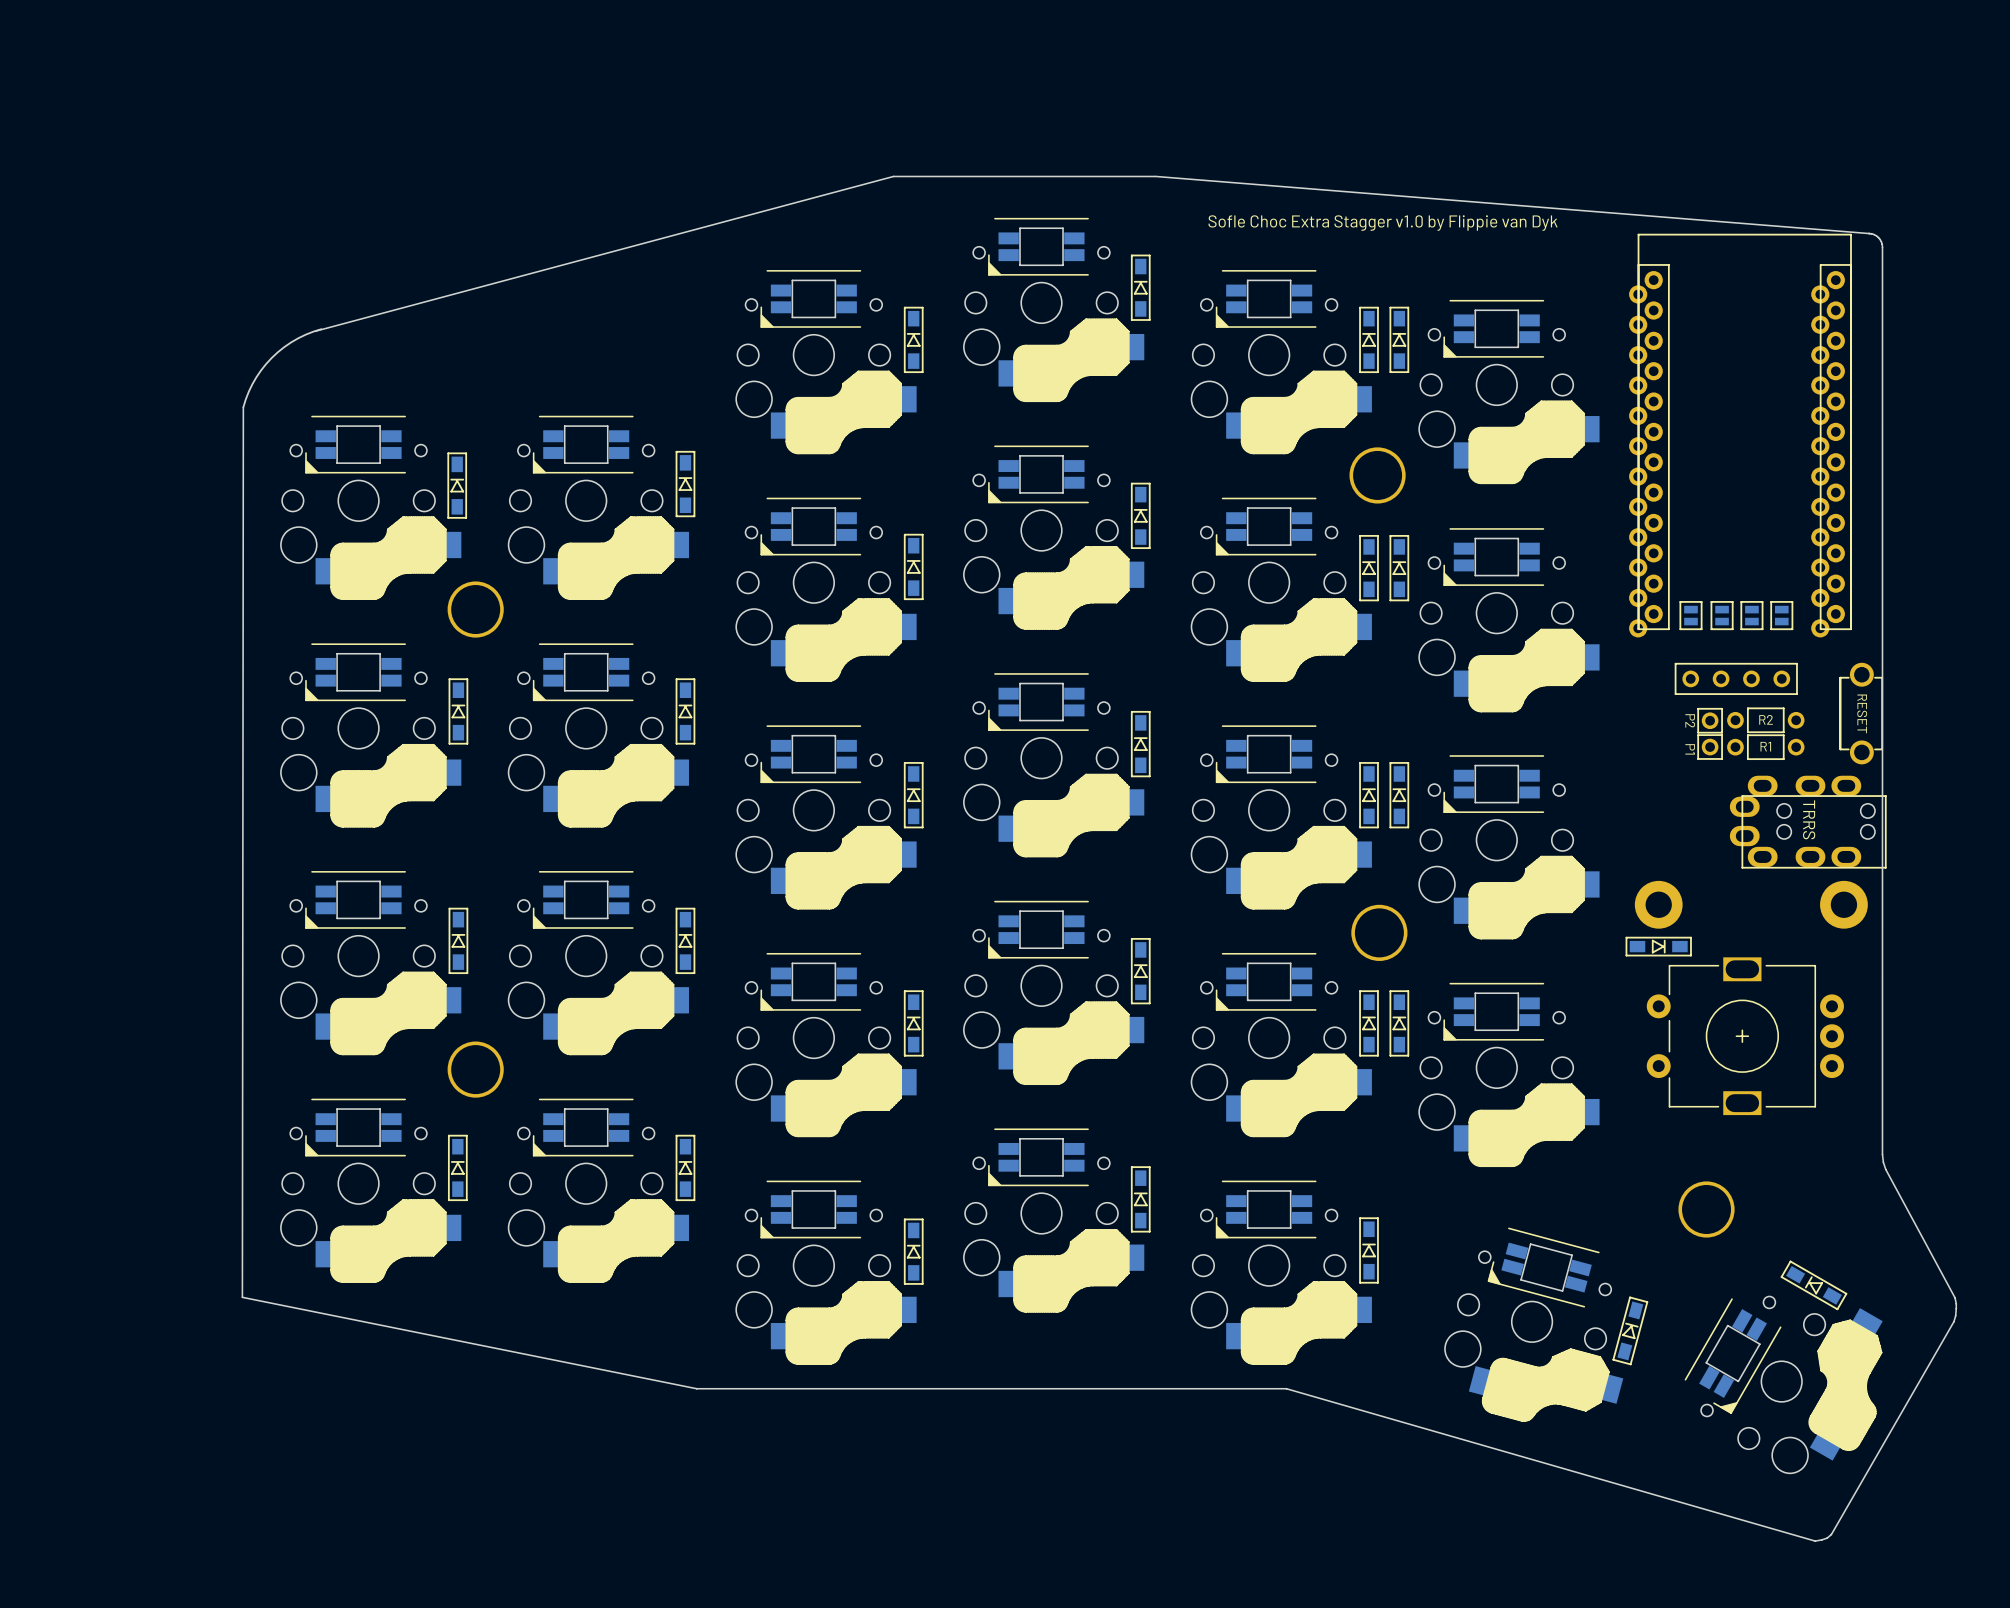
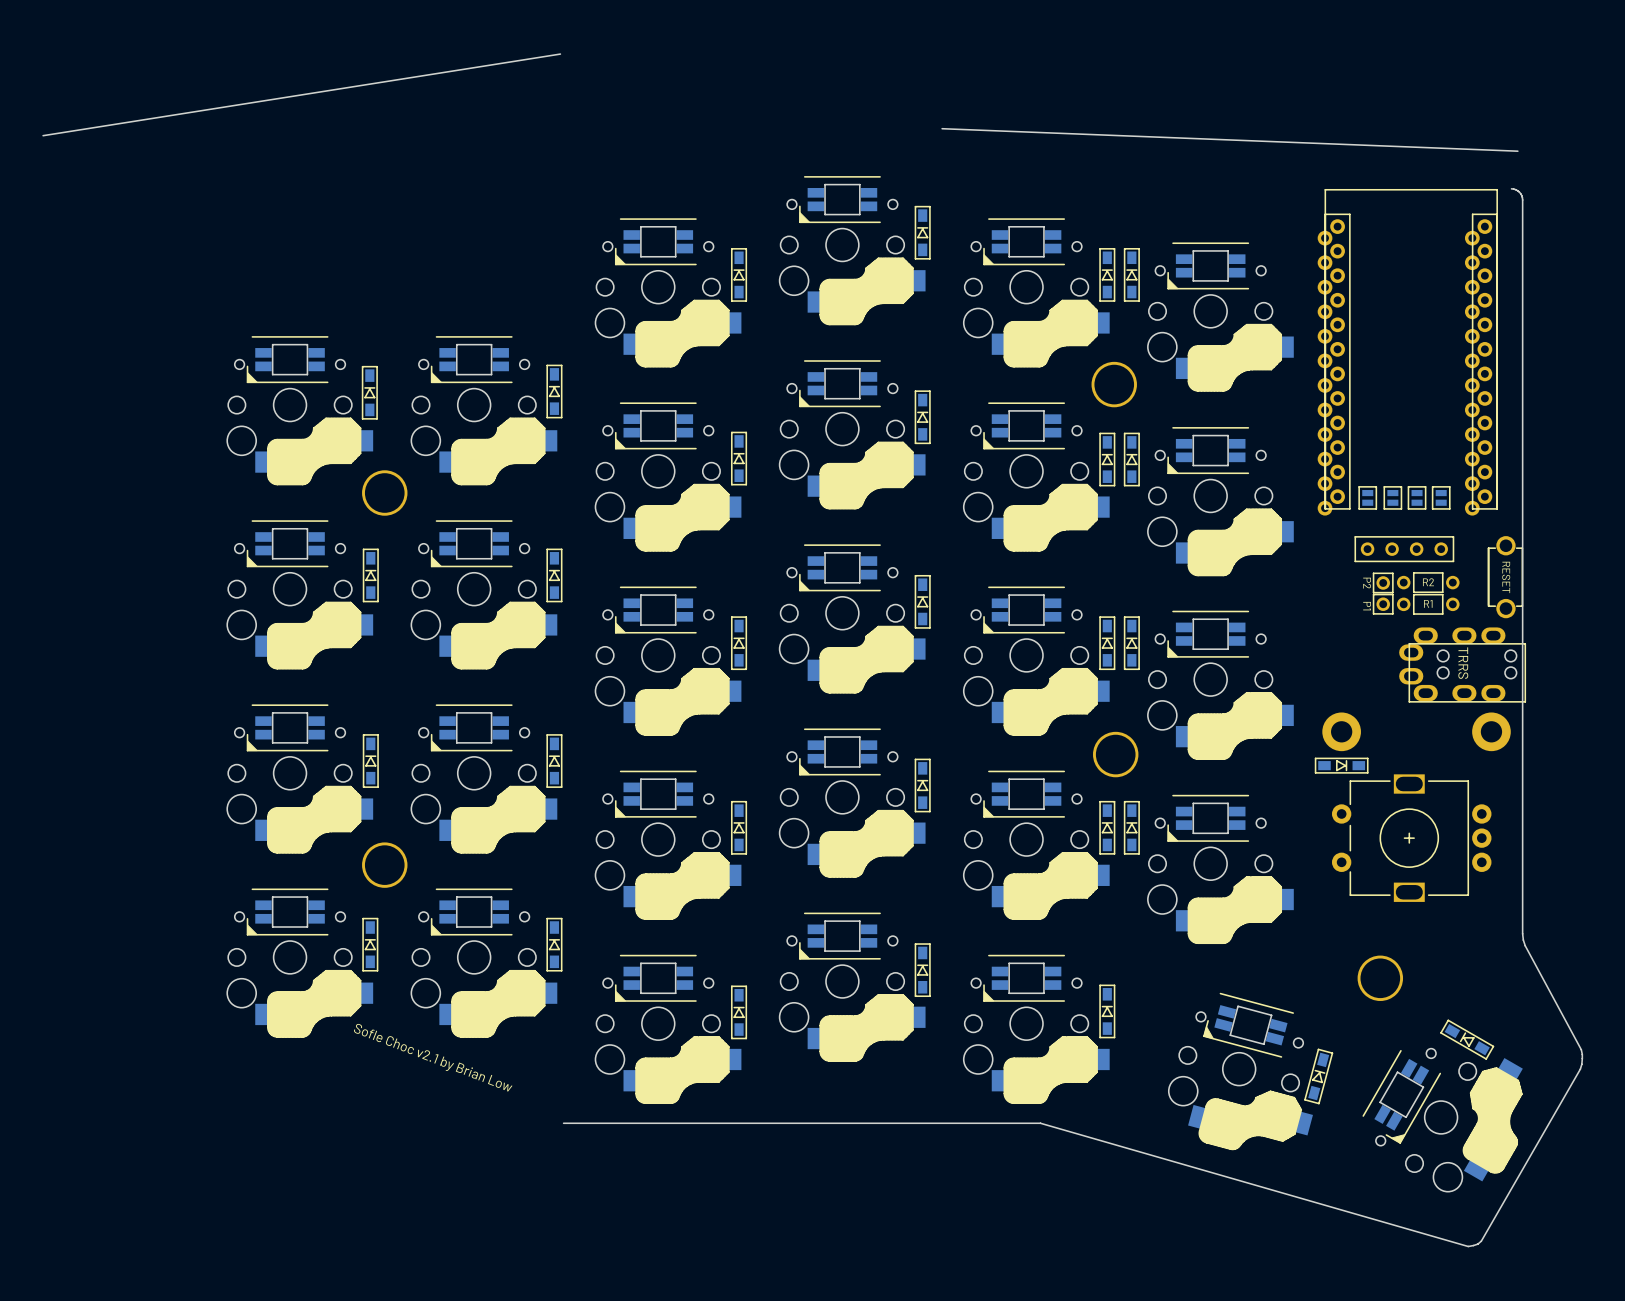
board edge: none -> (560, 54) (43, 135)
board edge: none -> (942, 128) (1517, 151)
board edge: (1155, 176) (893, 176) (315, 331) -> none
board edge: (1156, 176) (1870, 233) -> none
text: Sofle Choc Extra Stagger v1.0 by Flippie van Dyk (1383, 223) -> none
board edge: (321, 329) (291, 342) (271, 357) (252, 384) (243, 407) (242, 1297) (696, 1388) -> none
text: none -> Sofle Choc v2.1 by Brian Low (433, 1057)

